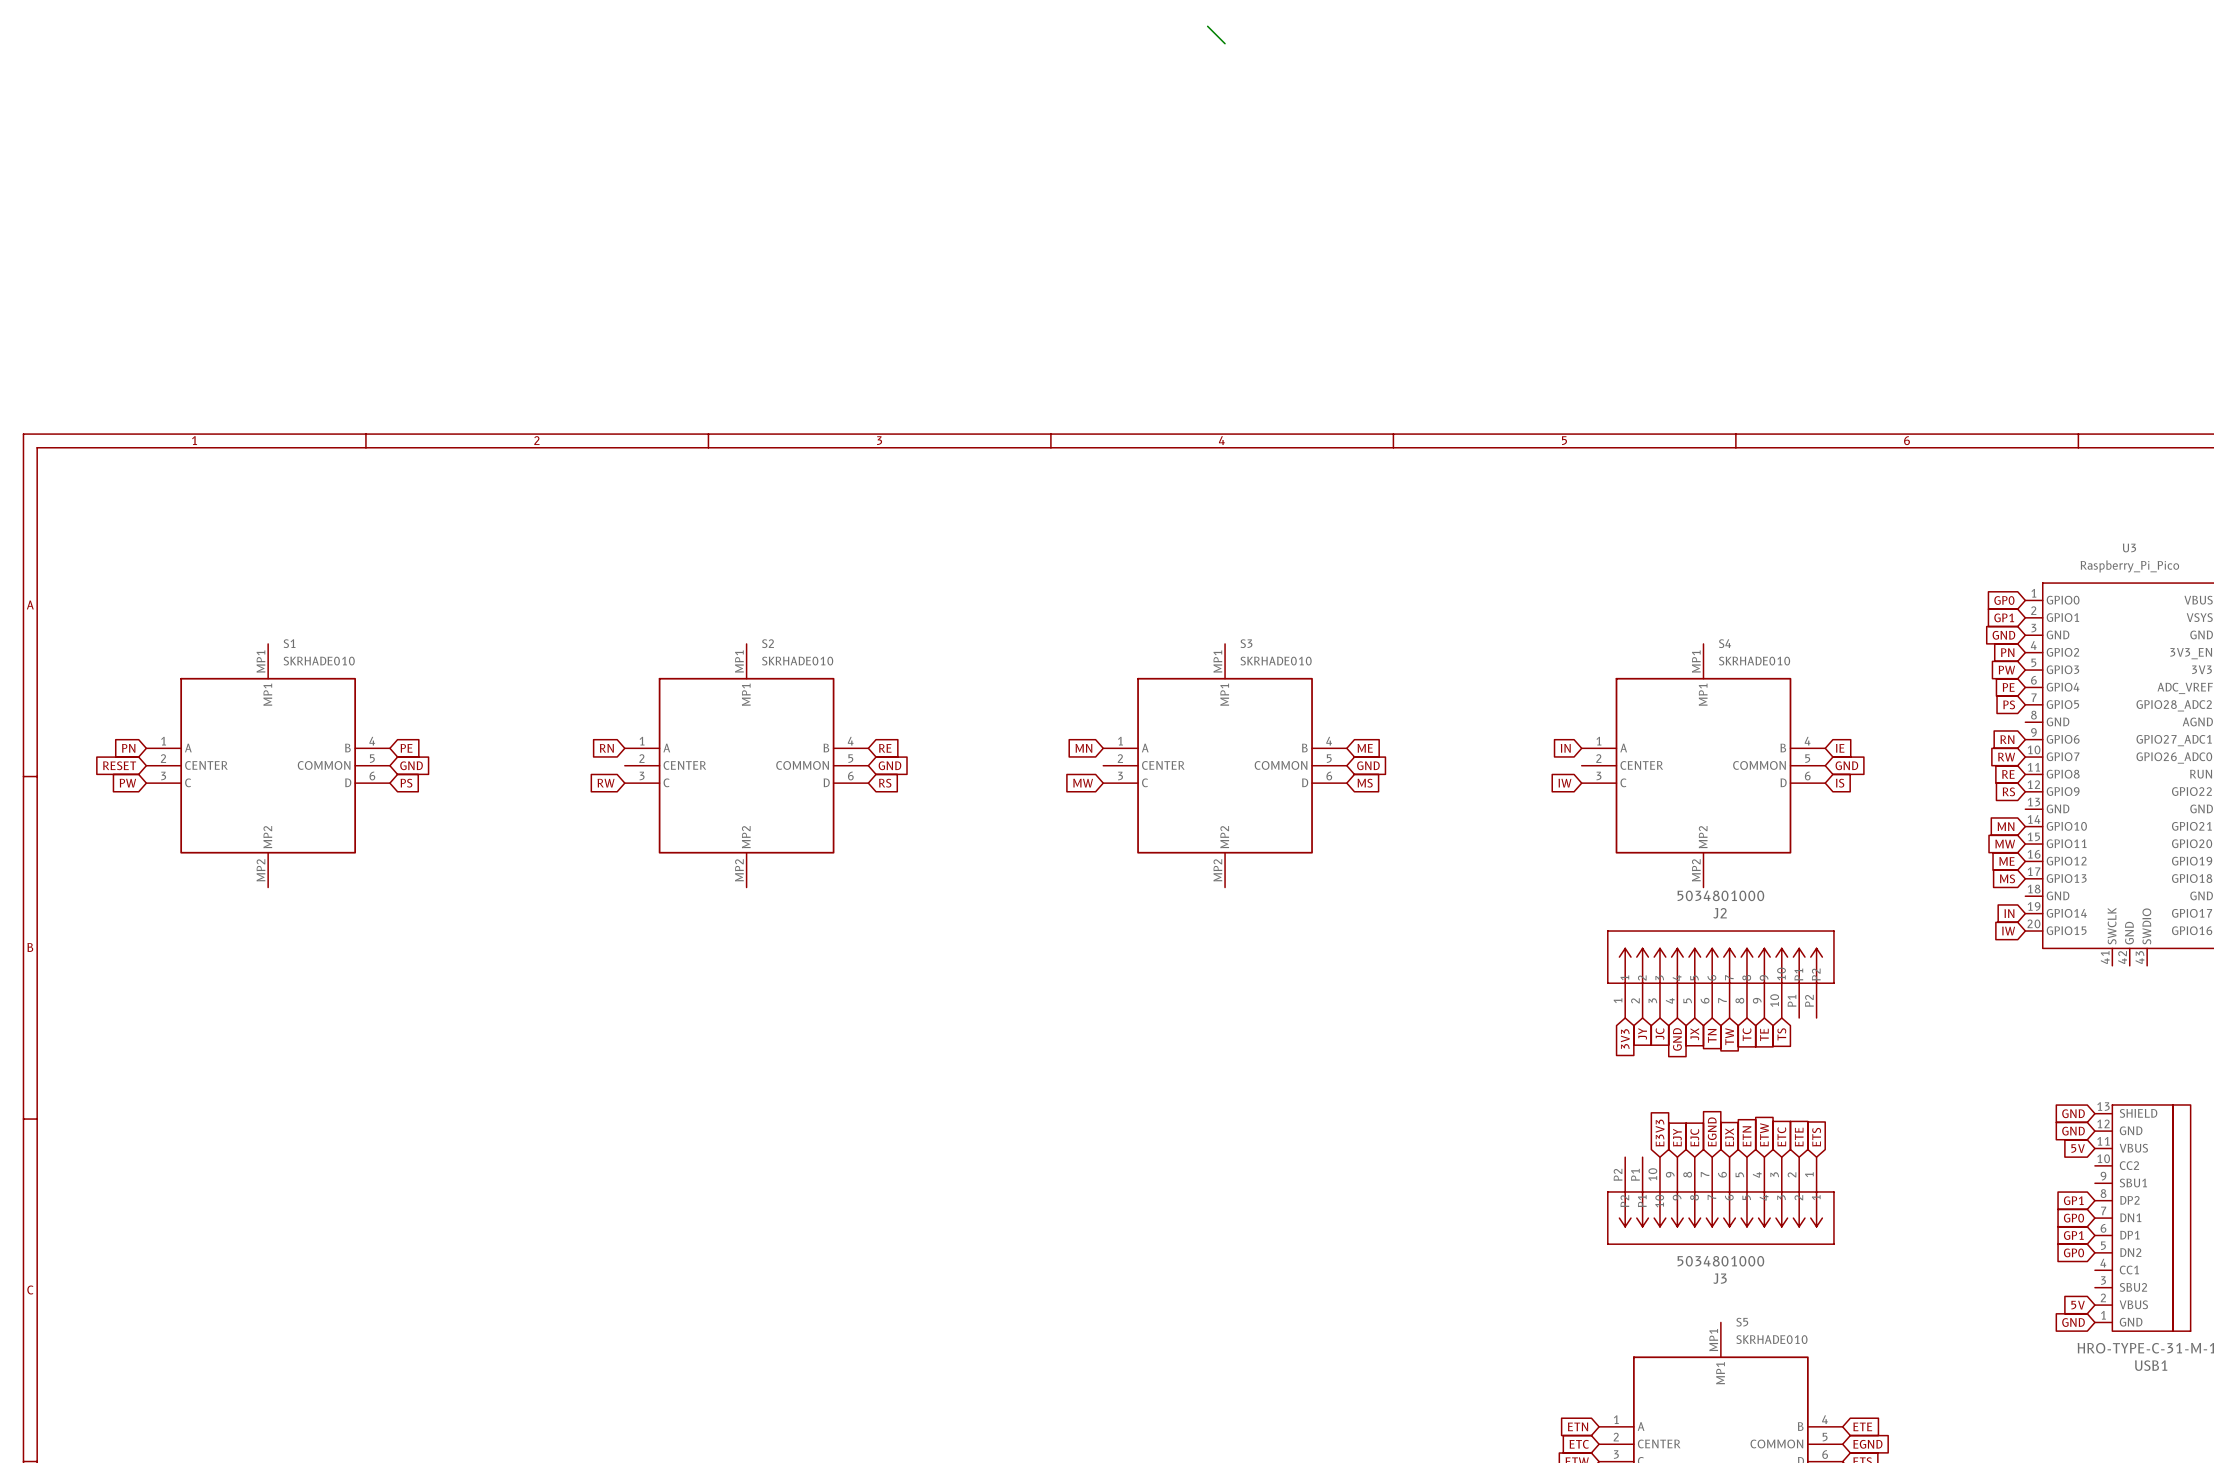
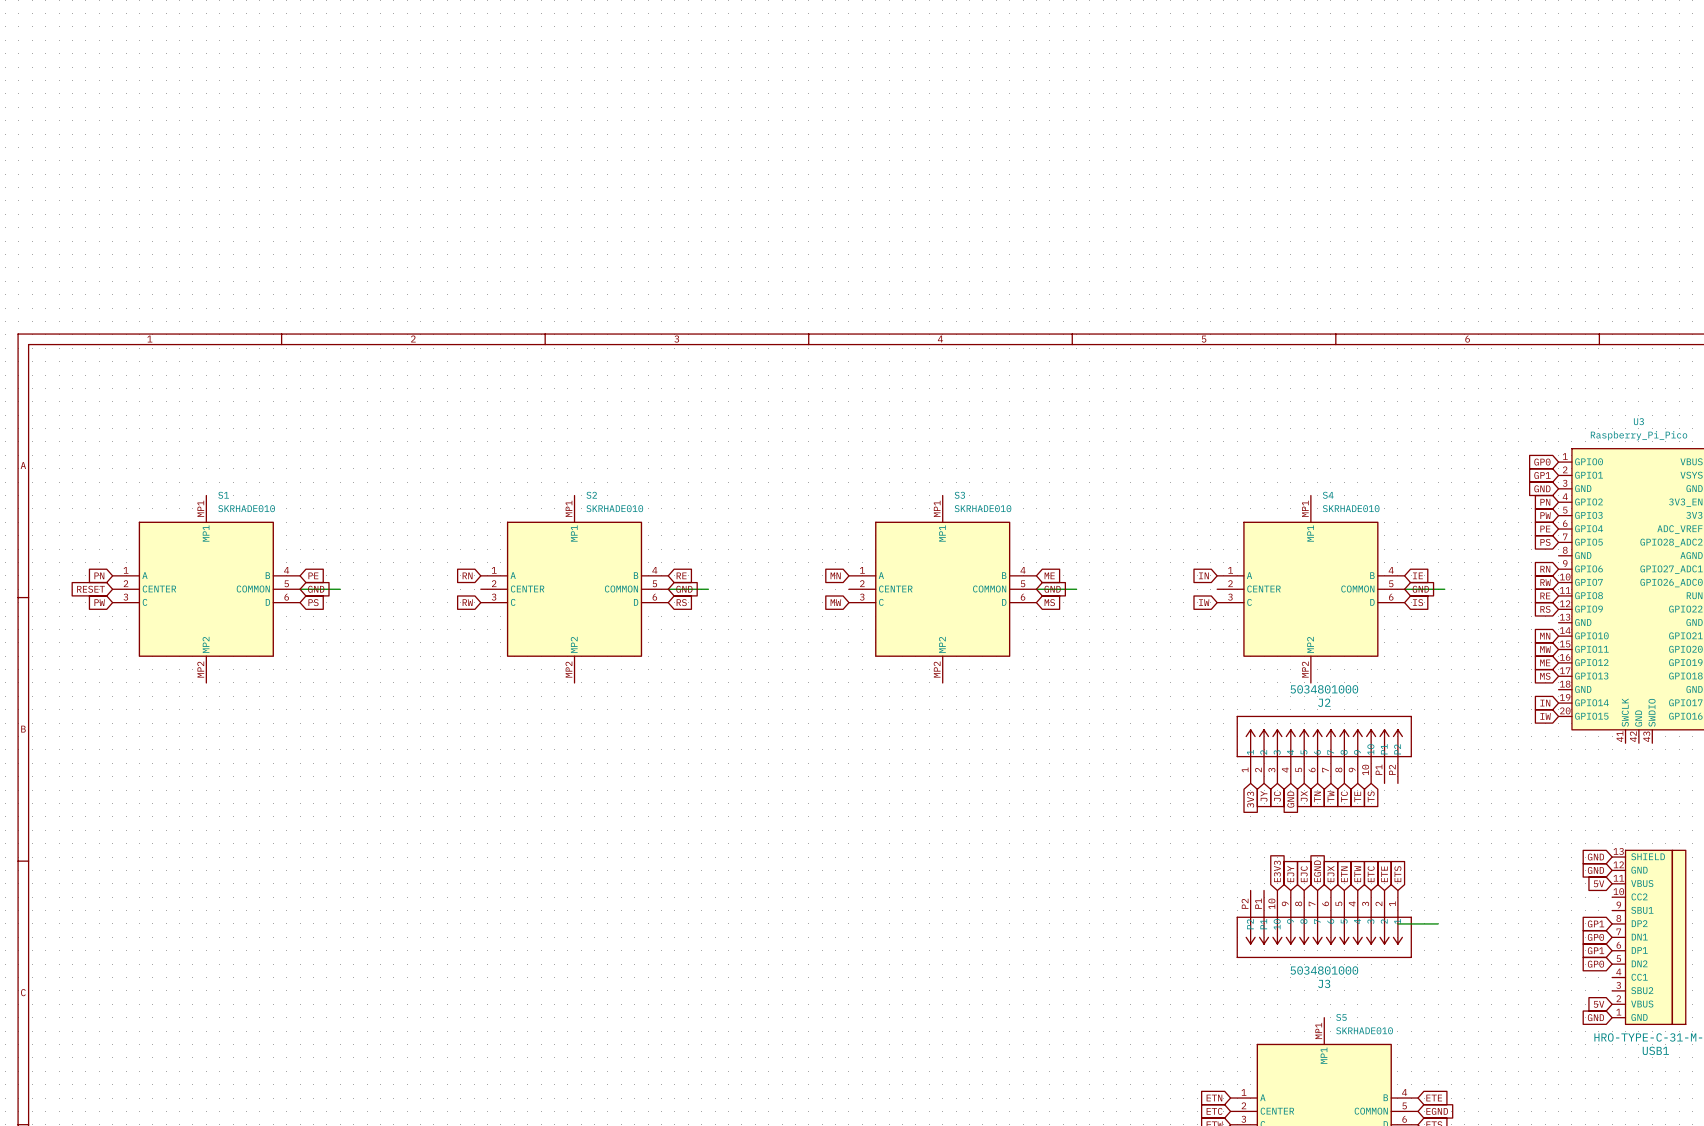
wire: (1207, 26) (1225, 43) -> none
wire: none -> (300, 589) (340, 589)
wire: none -> (668, 589) (708, 589)
wire: none -> (1036, 589) (1076, 589)
wire: none -> (1404, 589) (1444, 589)
wire: none -> (1397, 923) (1438, 923)

